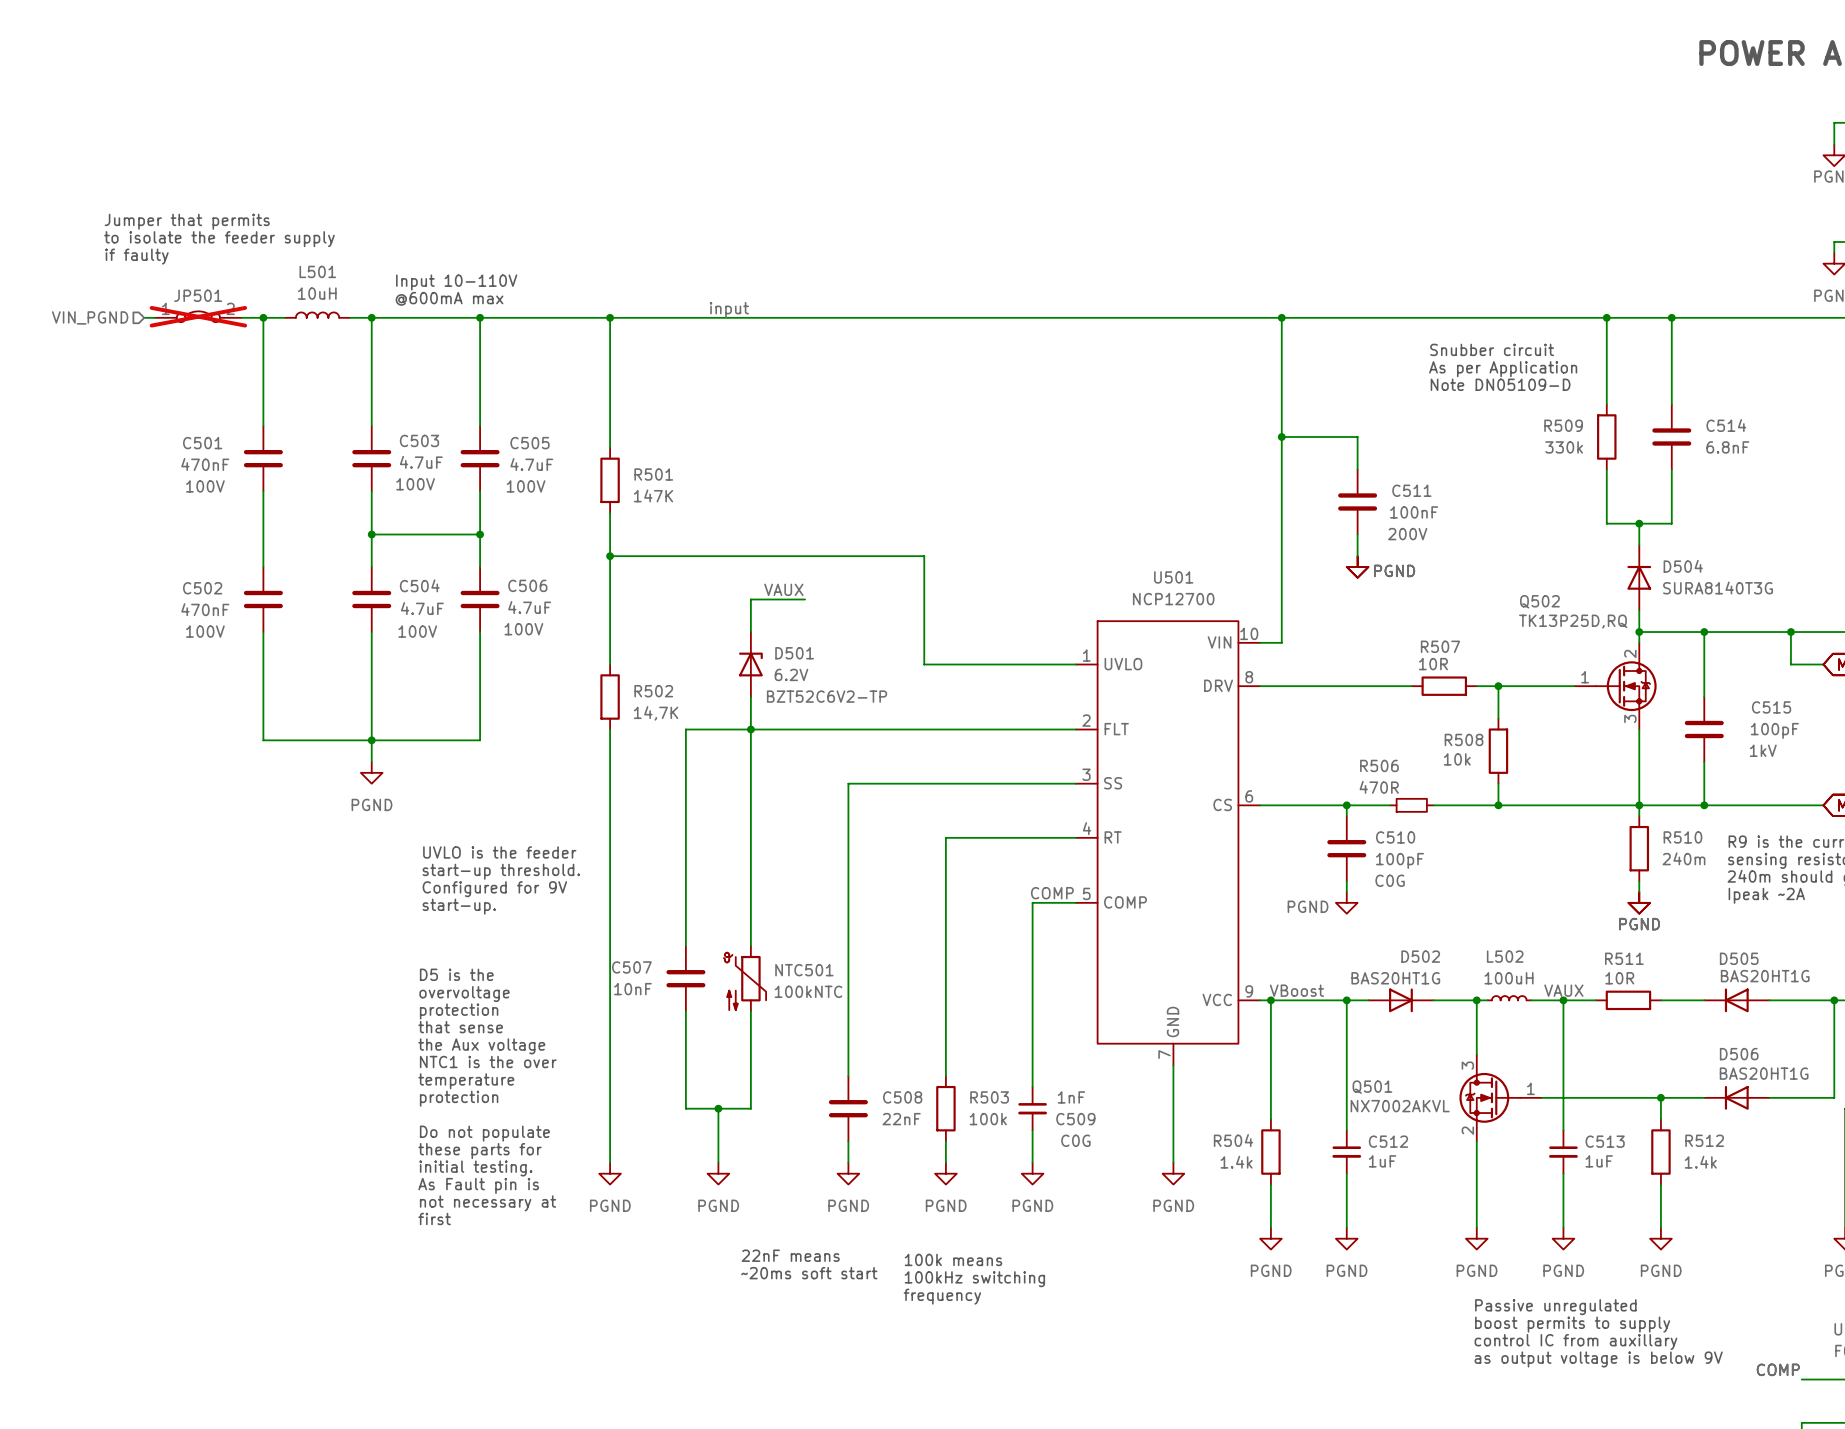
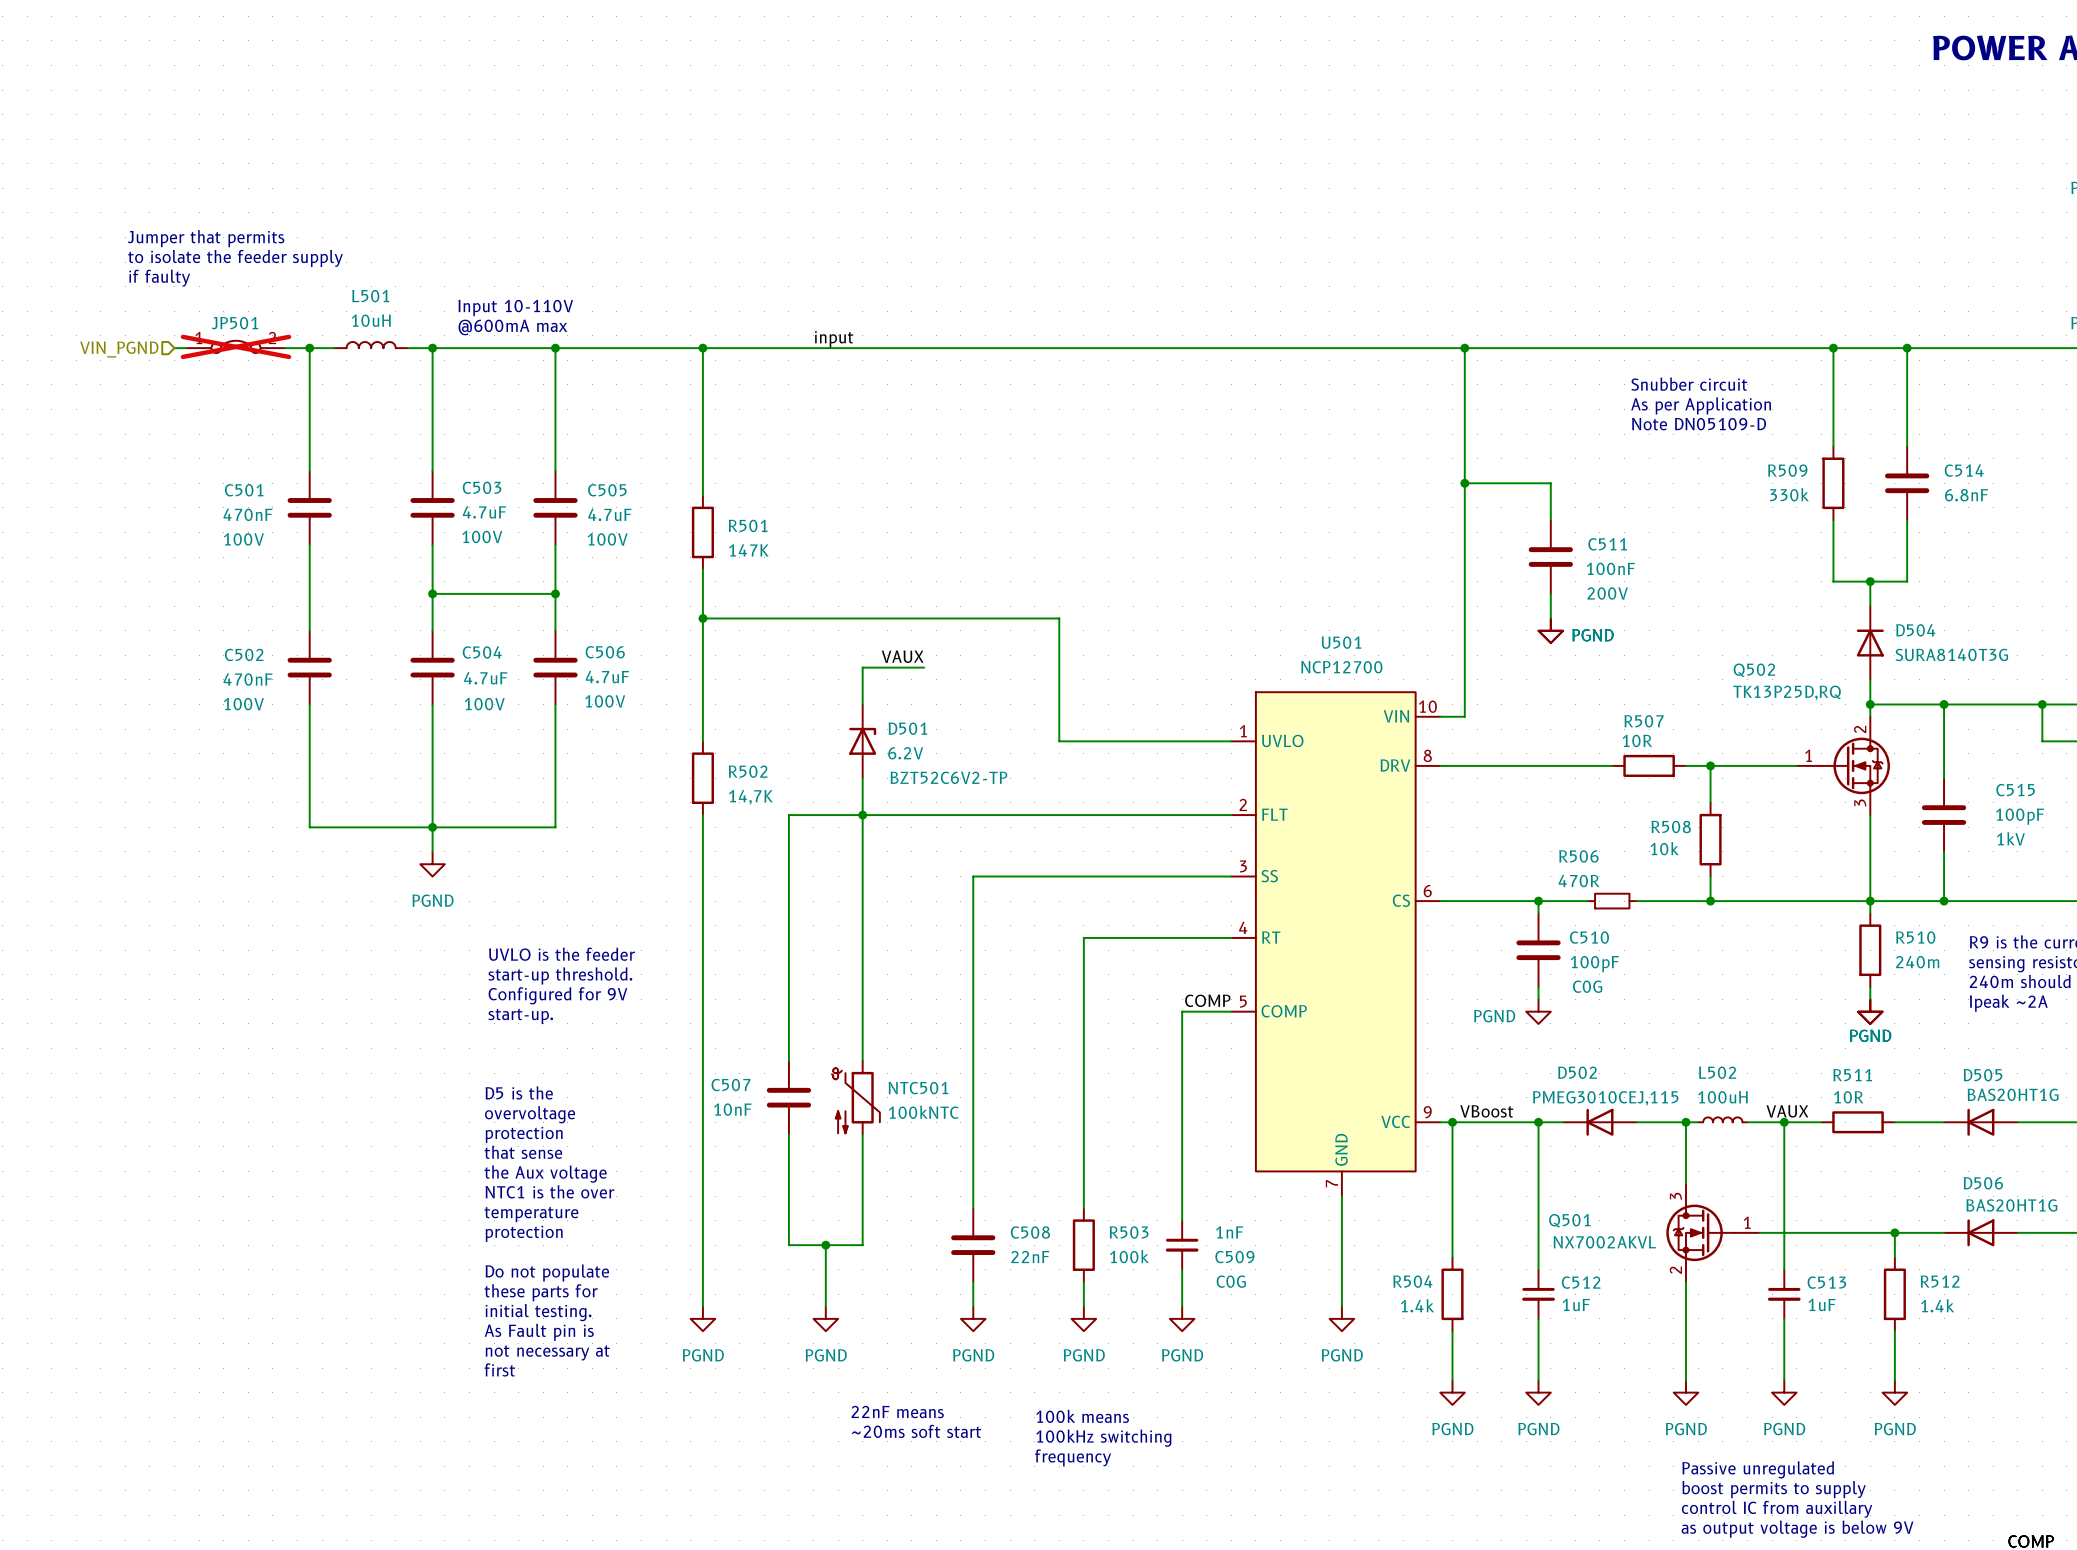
D502 name position: D502 (1420, 956) -> D502 (1577, 1072)
D502 value: BAS20HT1G (1395, 978) -> PMEG3010CEJ,115 (1605, 1098)
D502 rotation: 0° (1400, 1000) -> 180° (1599, 1122)

